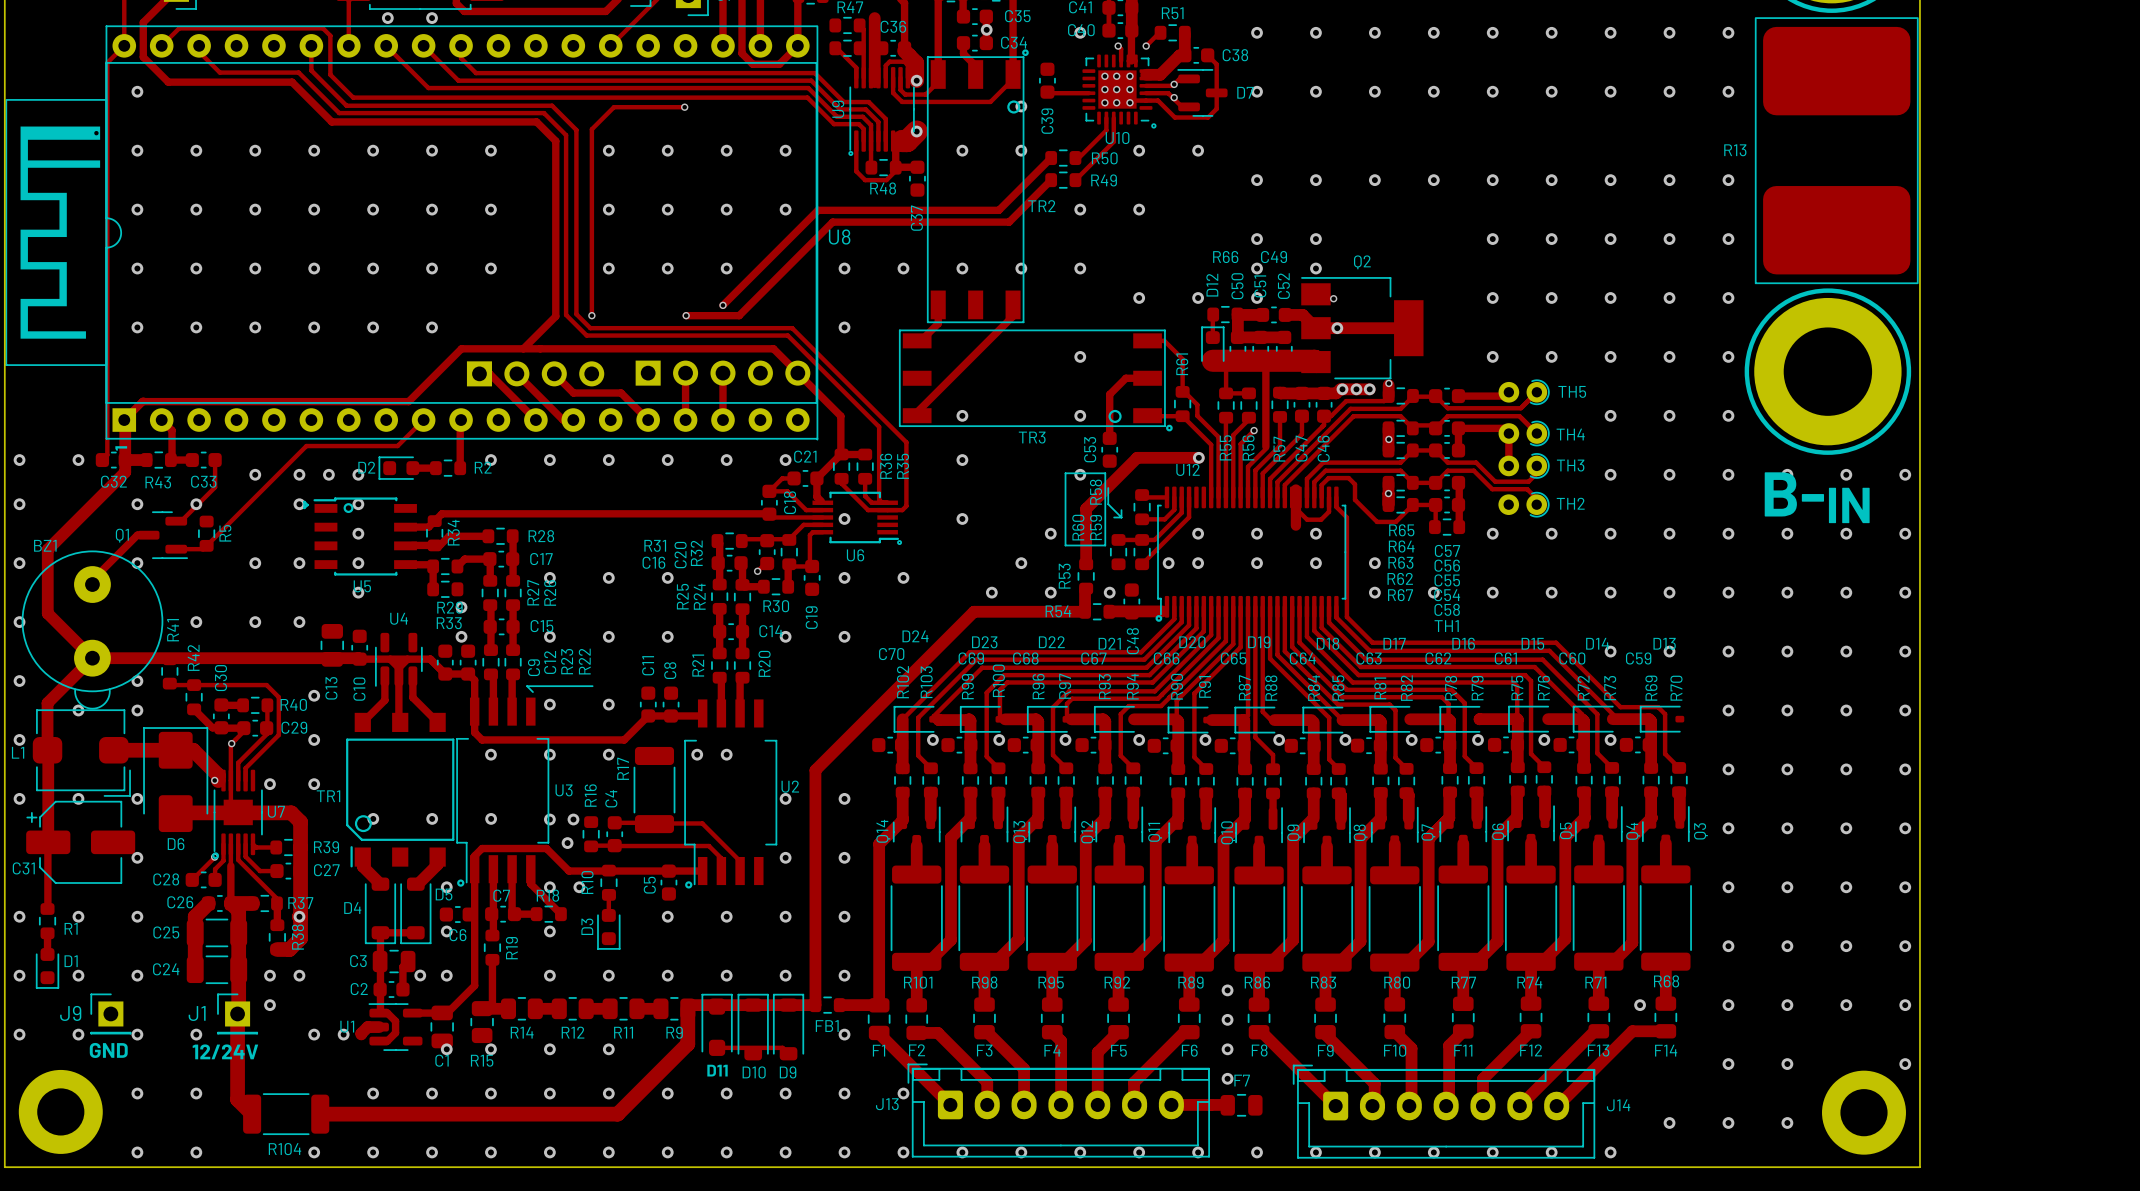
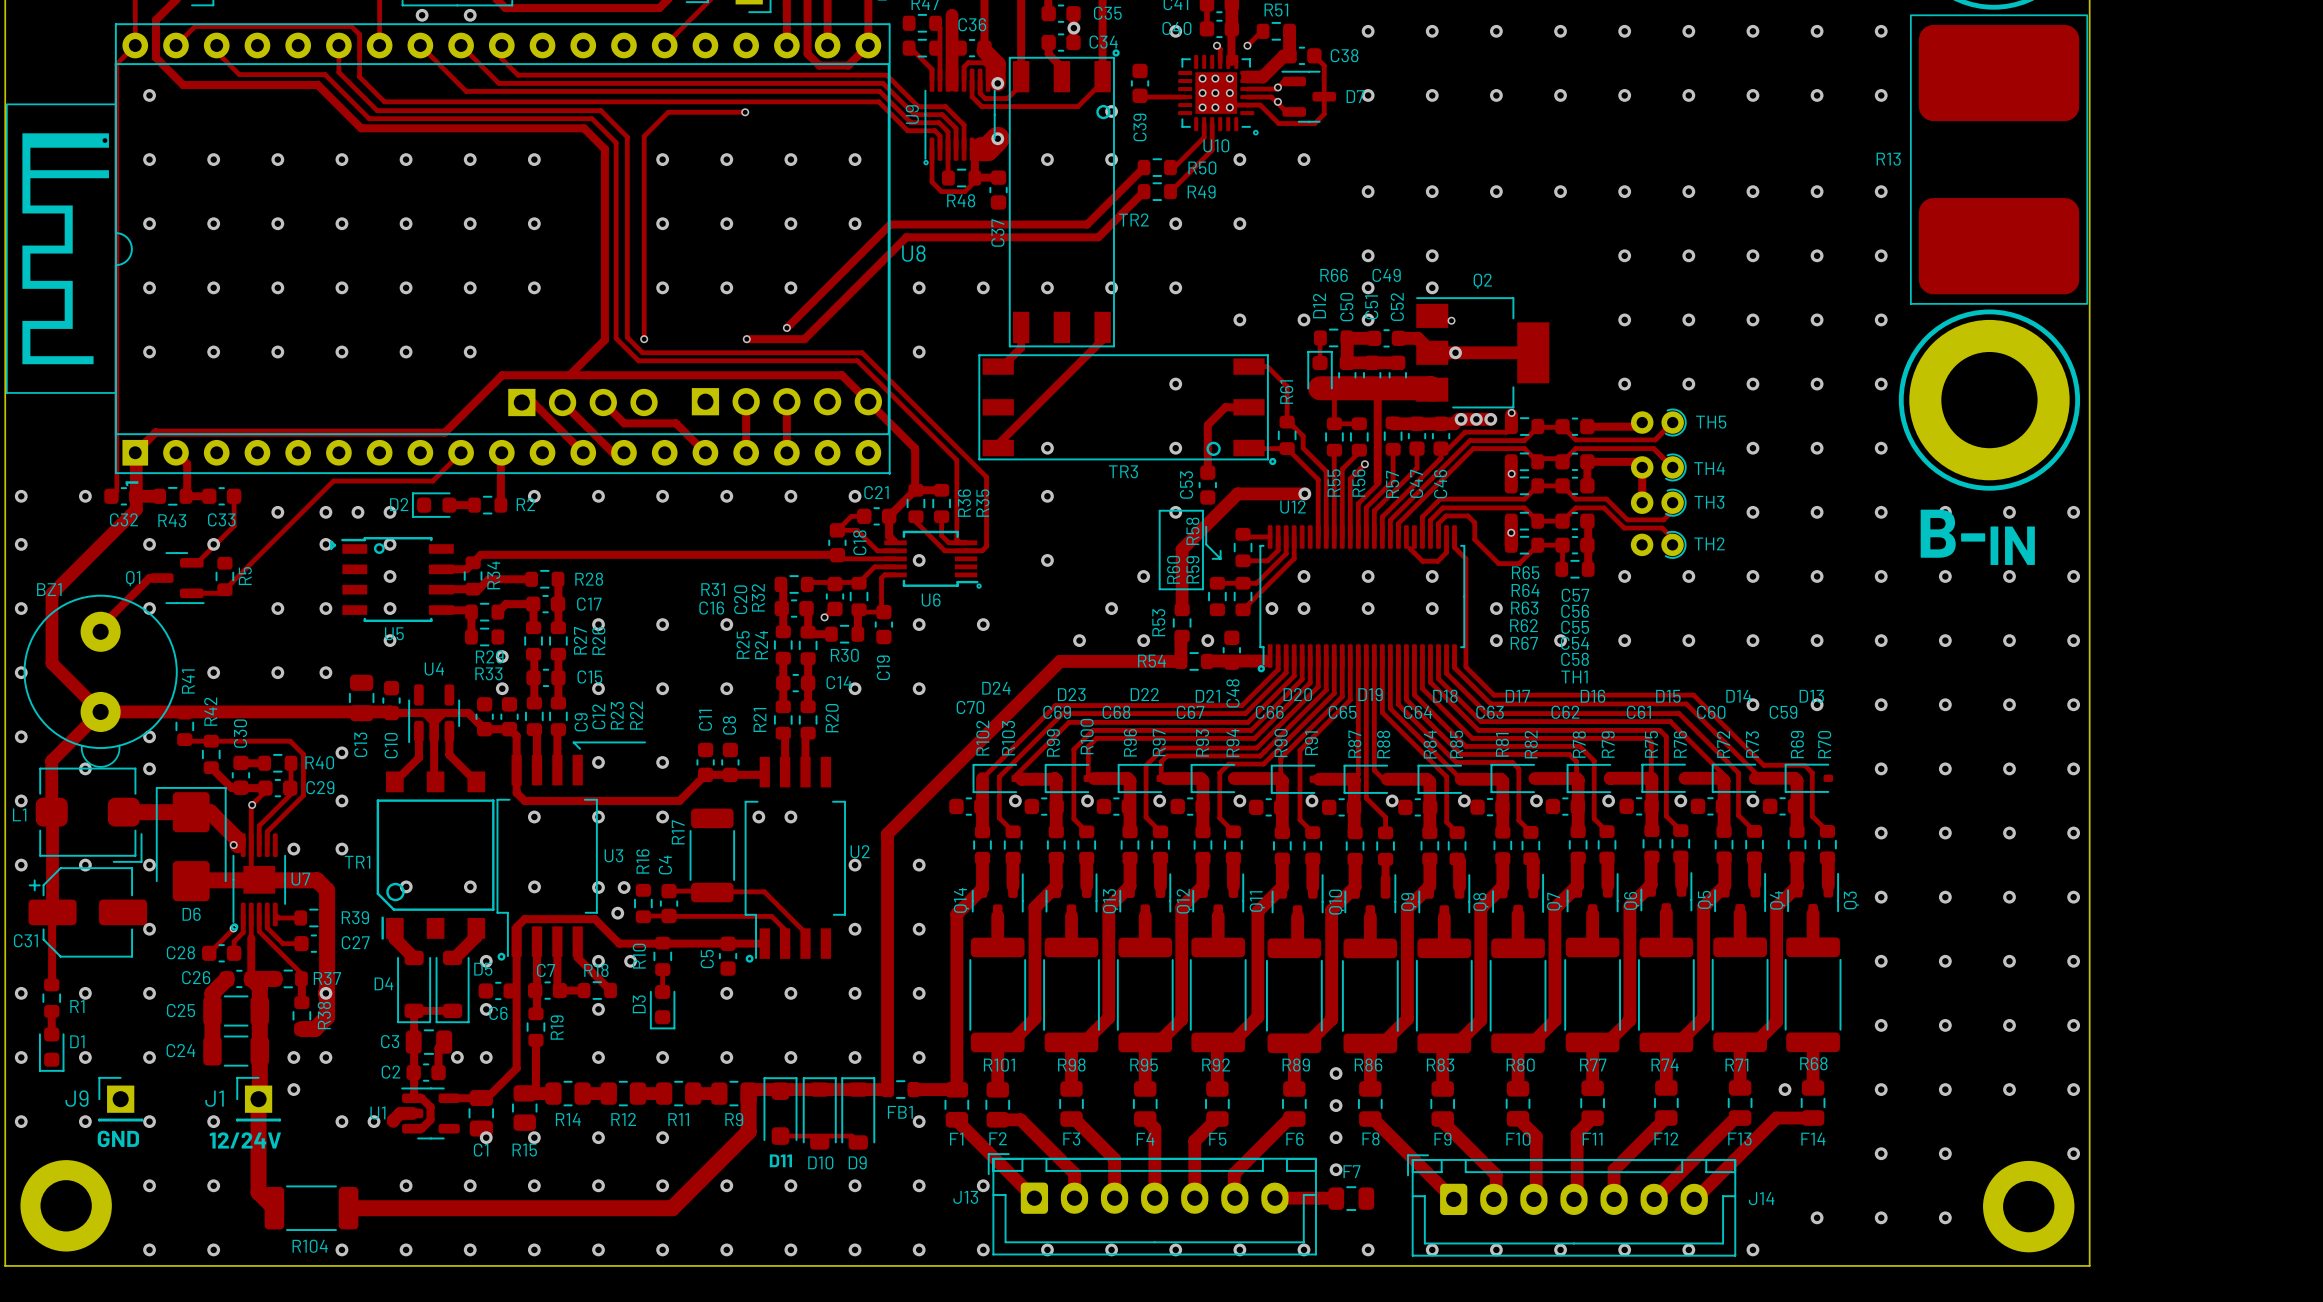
track: (1295, 489) (1295, 525) -> none

